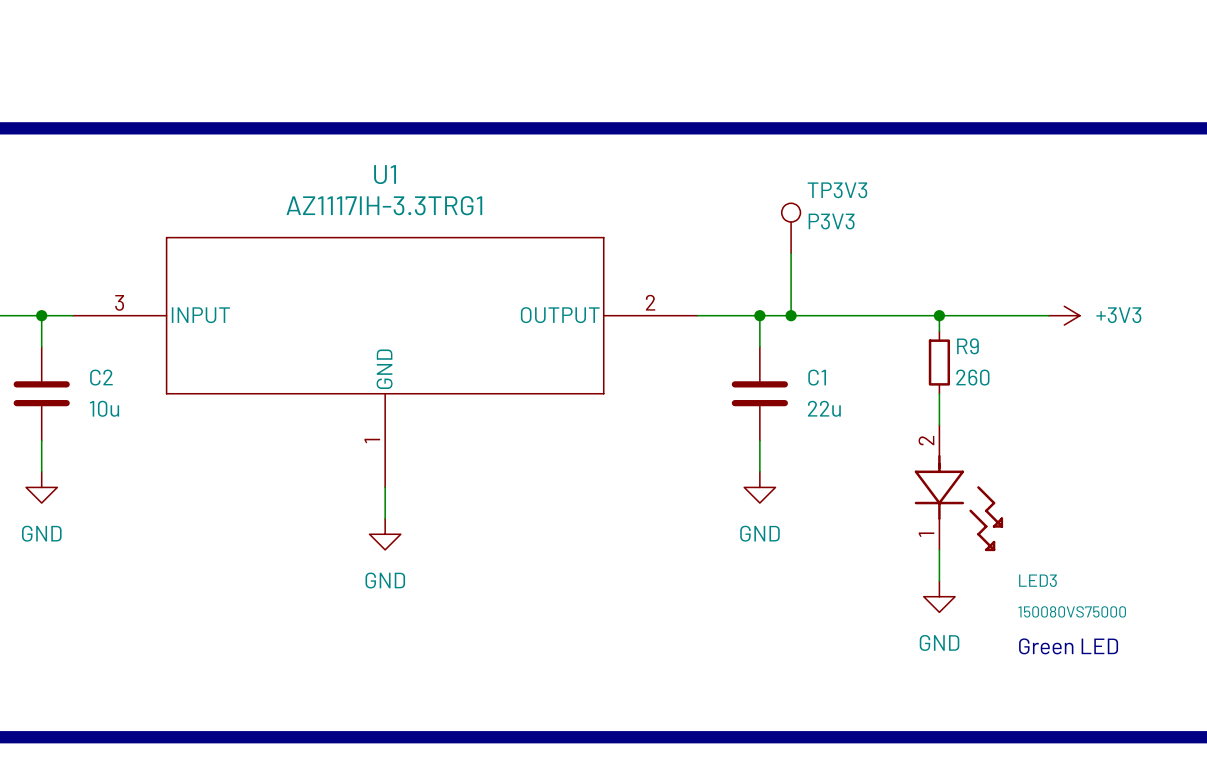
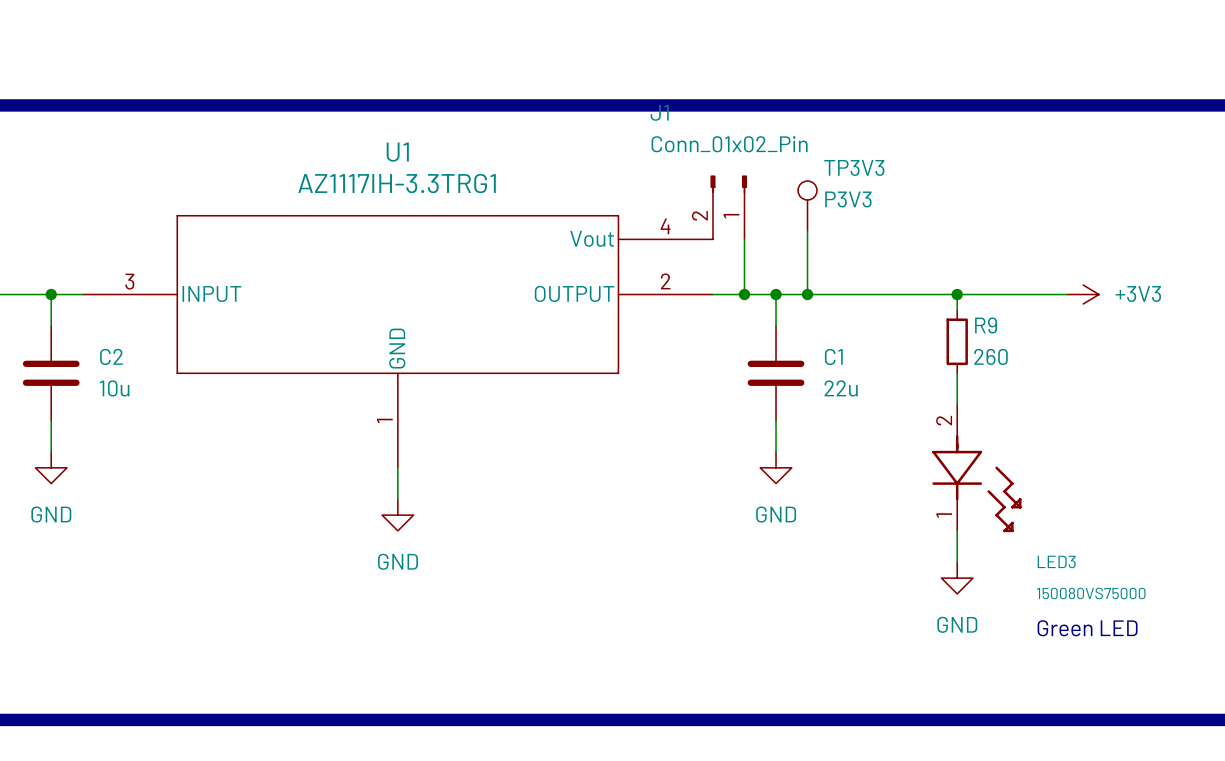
J1: none -> Conn_01x02_Pin (728, 207)
U1 symbol: [72, 236, 698, 488] -> [82, 214, 713, 468]
wire: none -> (744, 239) (744, 294)
junction: none -> (744, 294)

